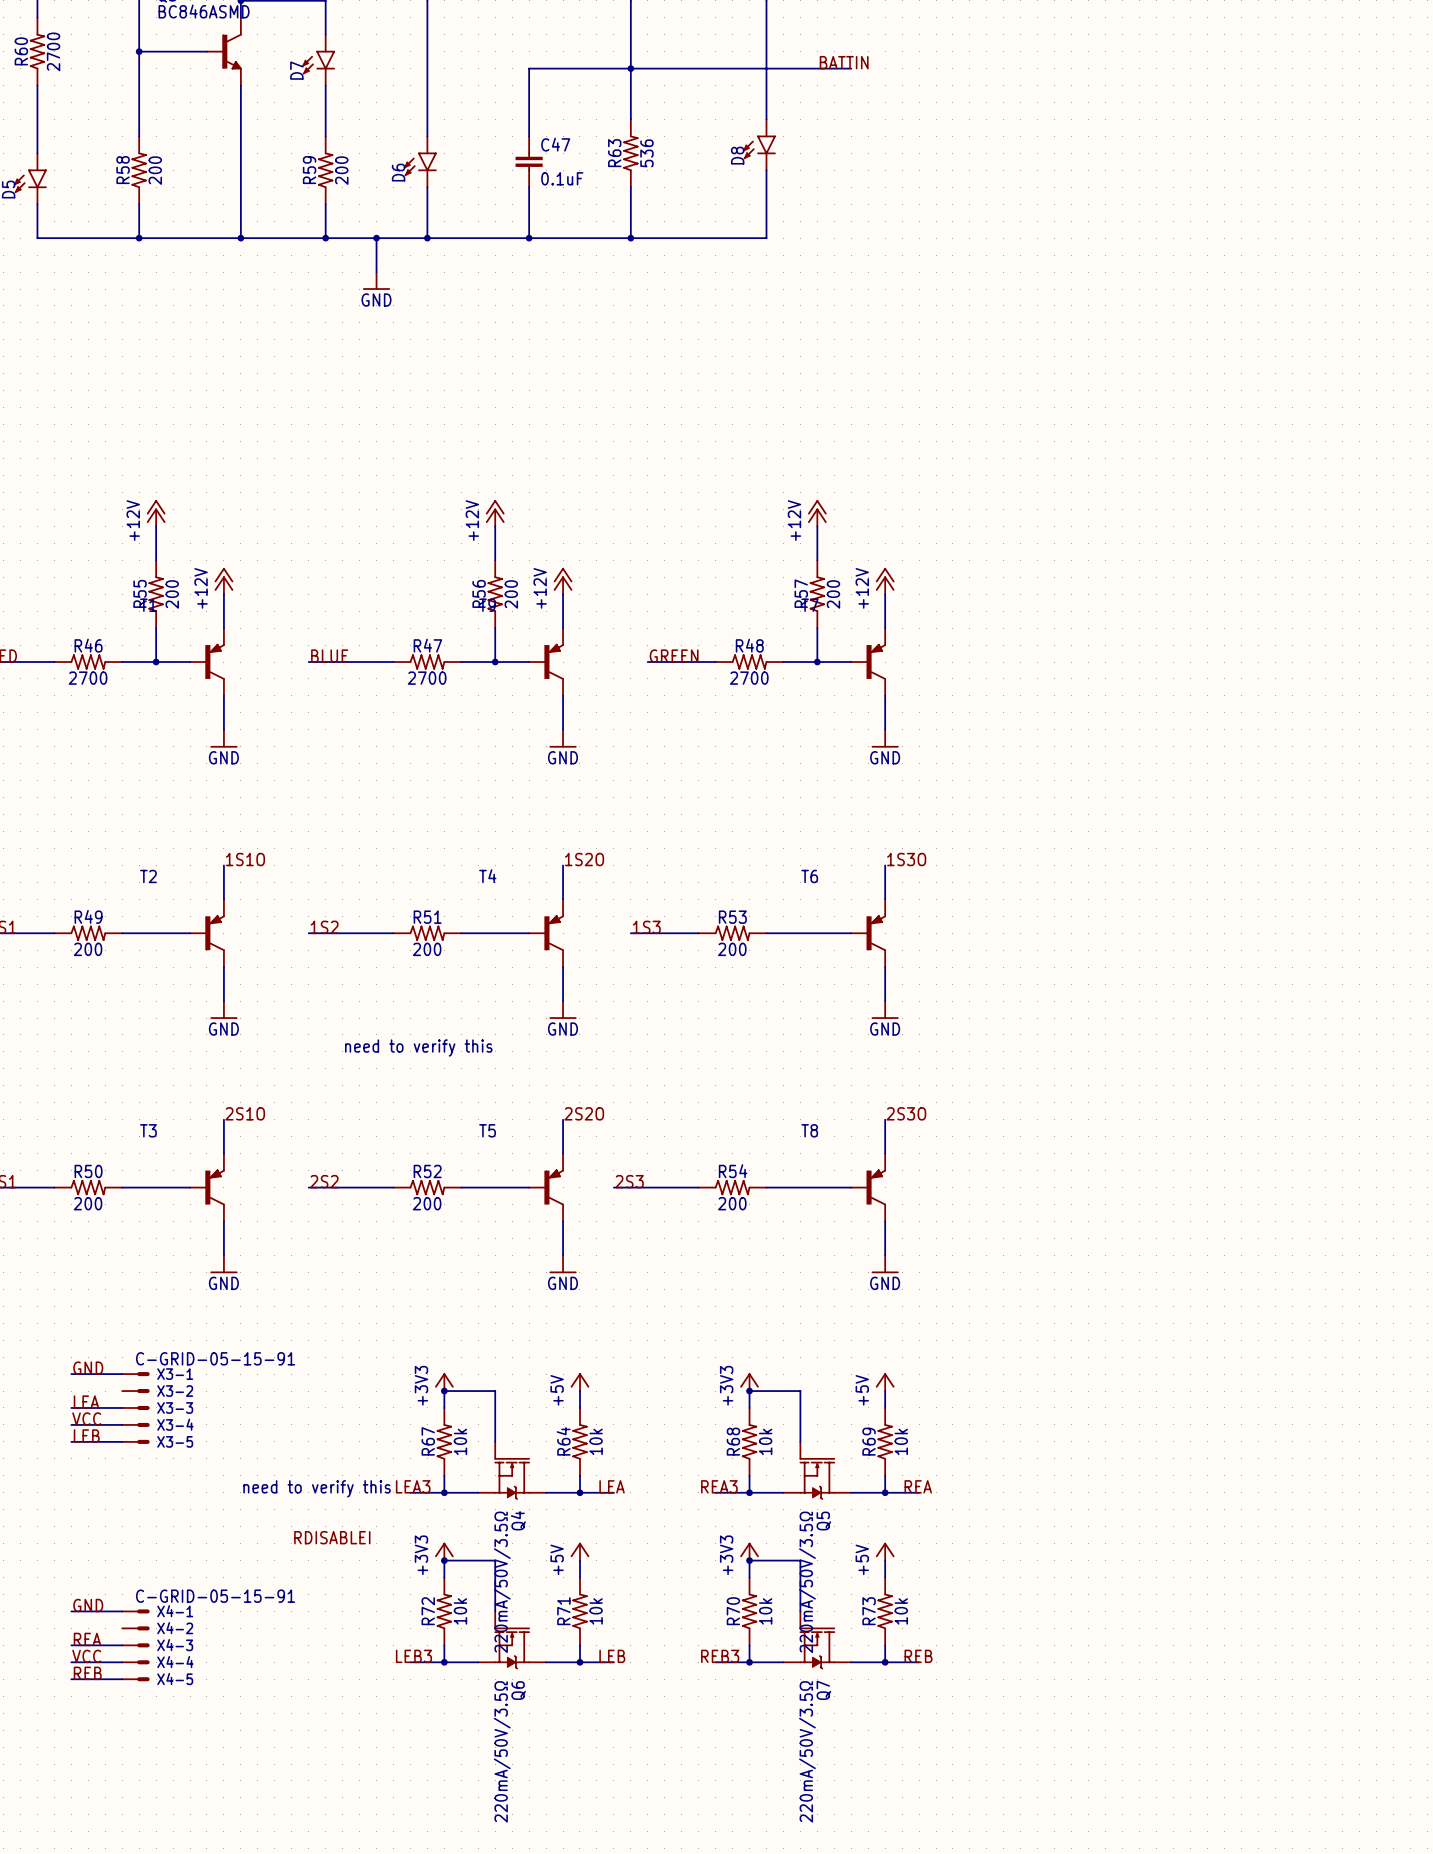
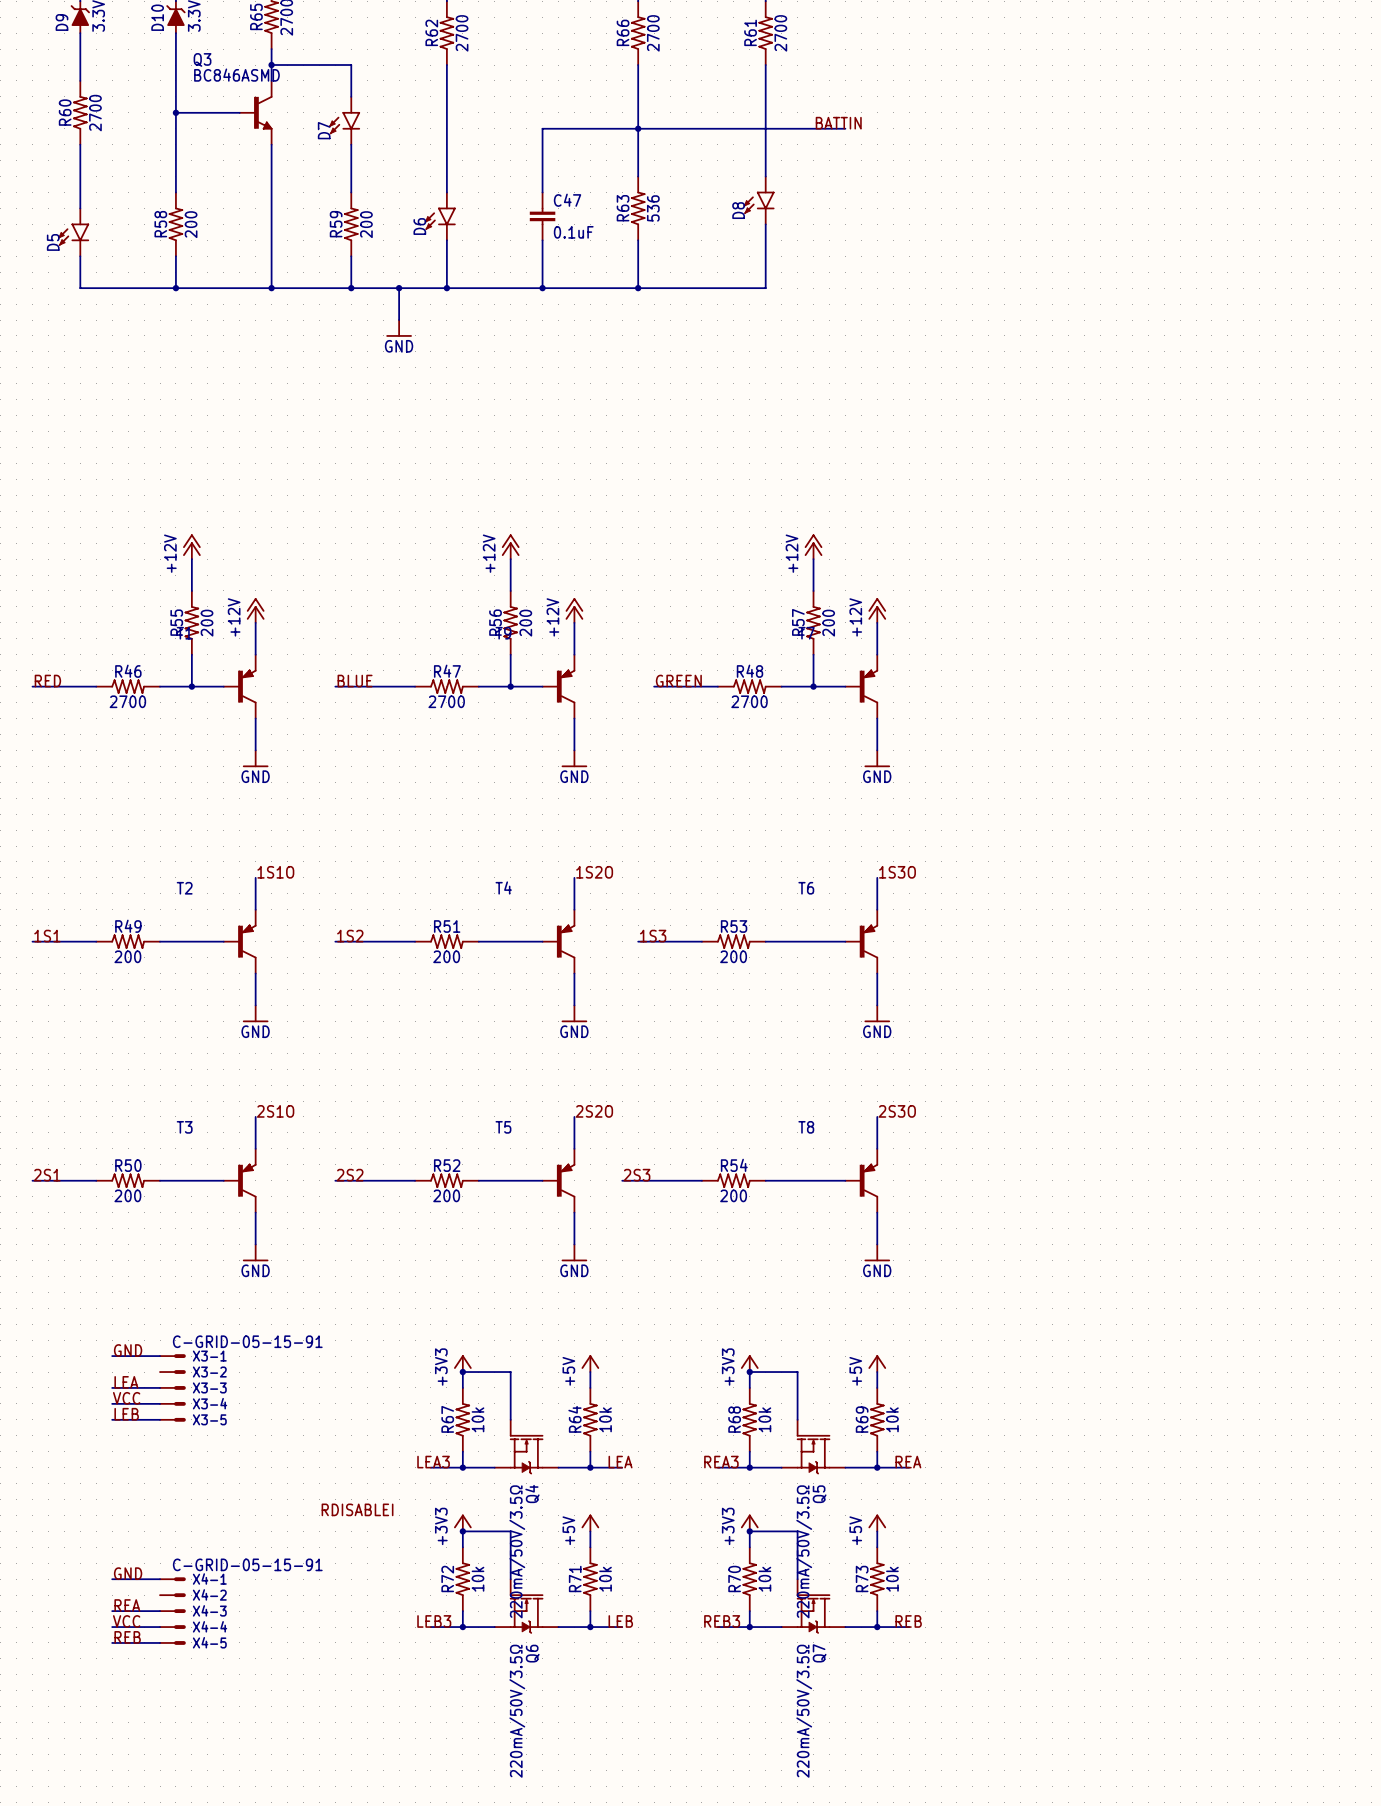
text: need to verify this (418, 1047) -> none
text: need to verify this (317, 1488) -> none

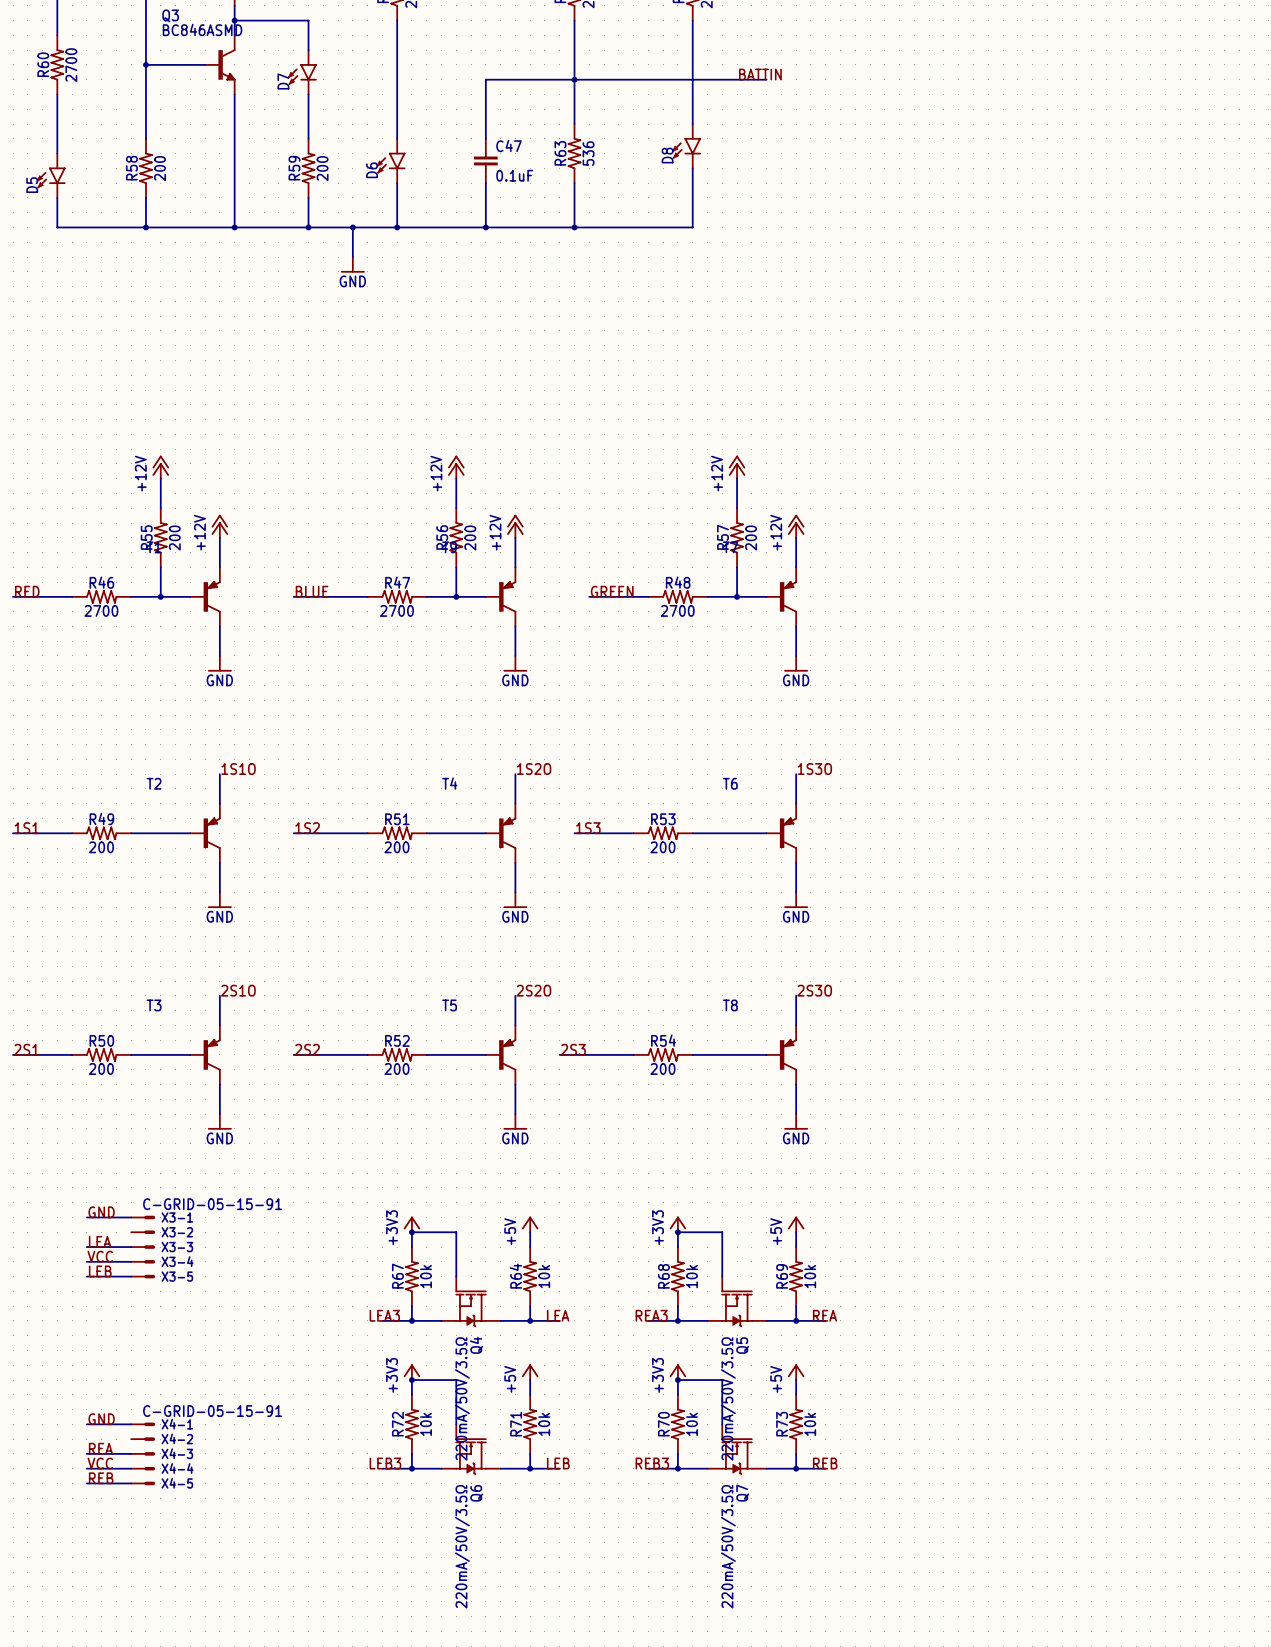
label: RDISABLEI (357, 1509) -> none

